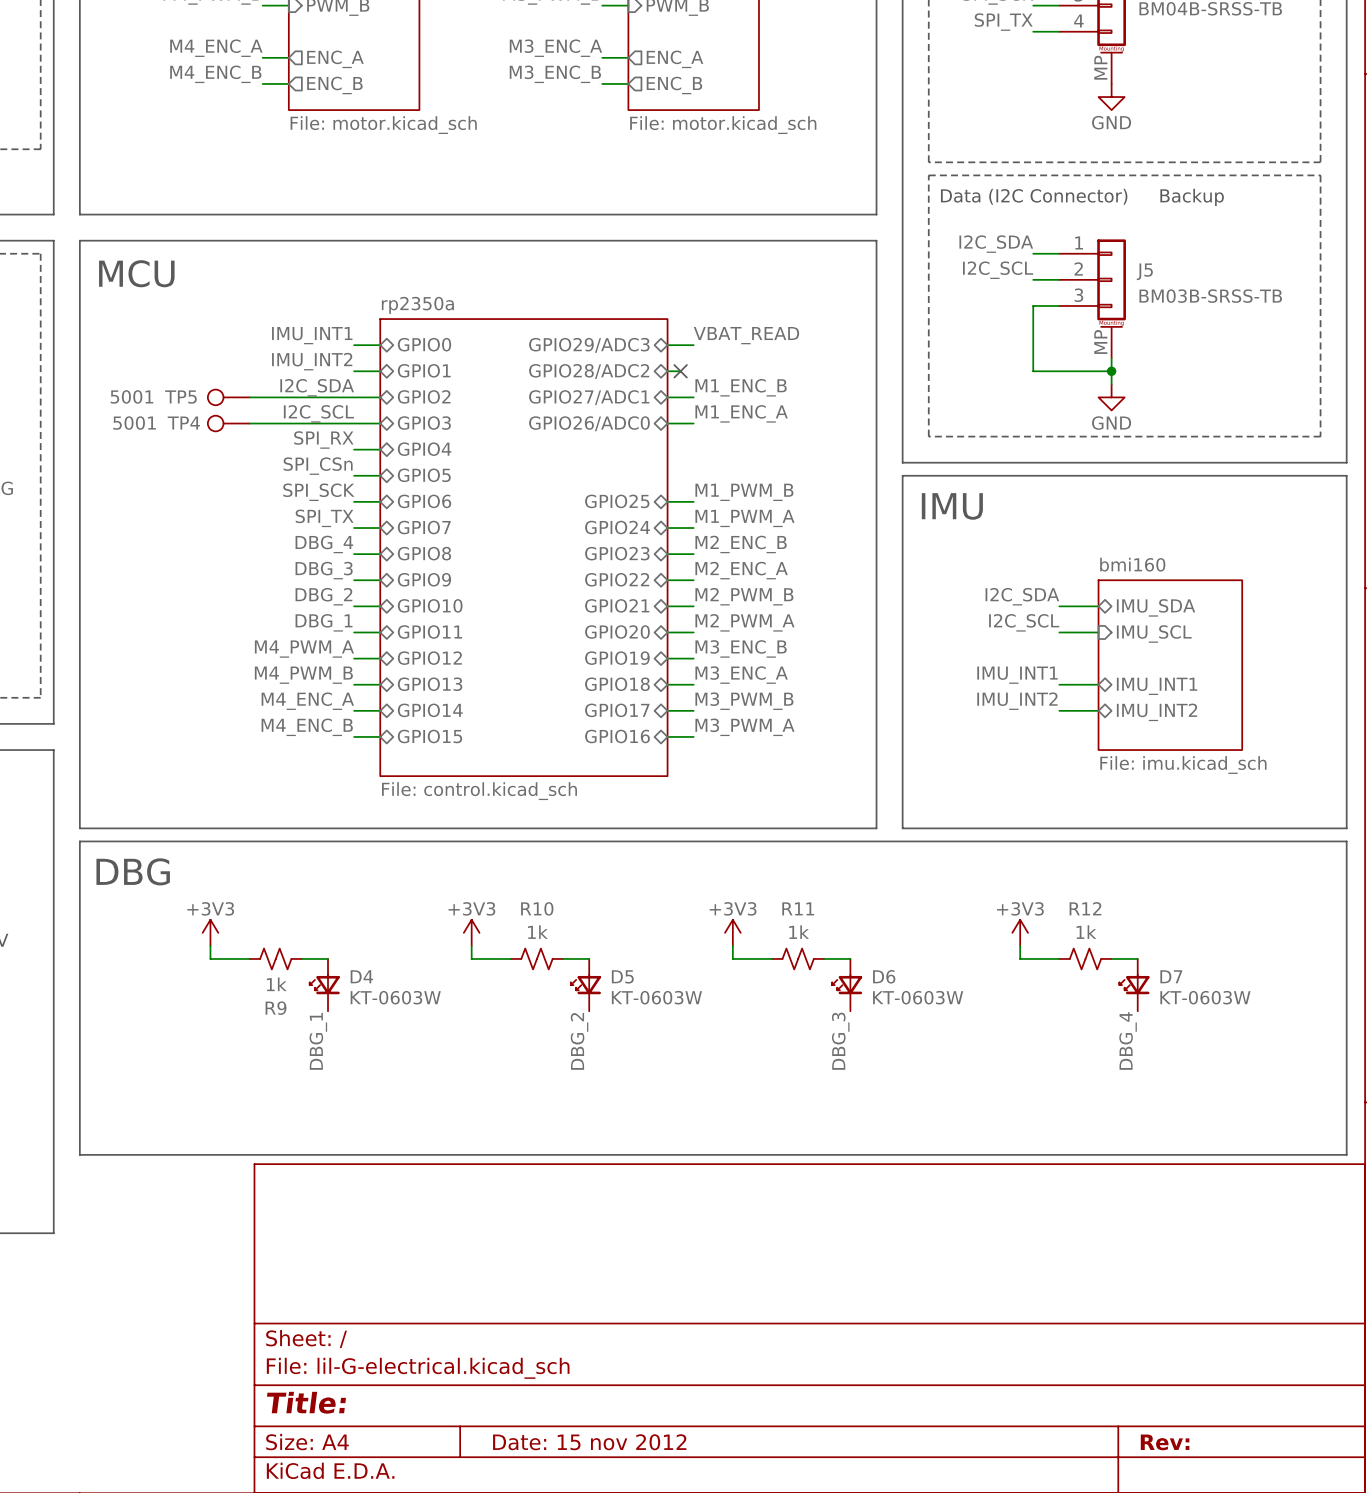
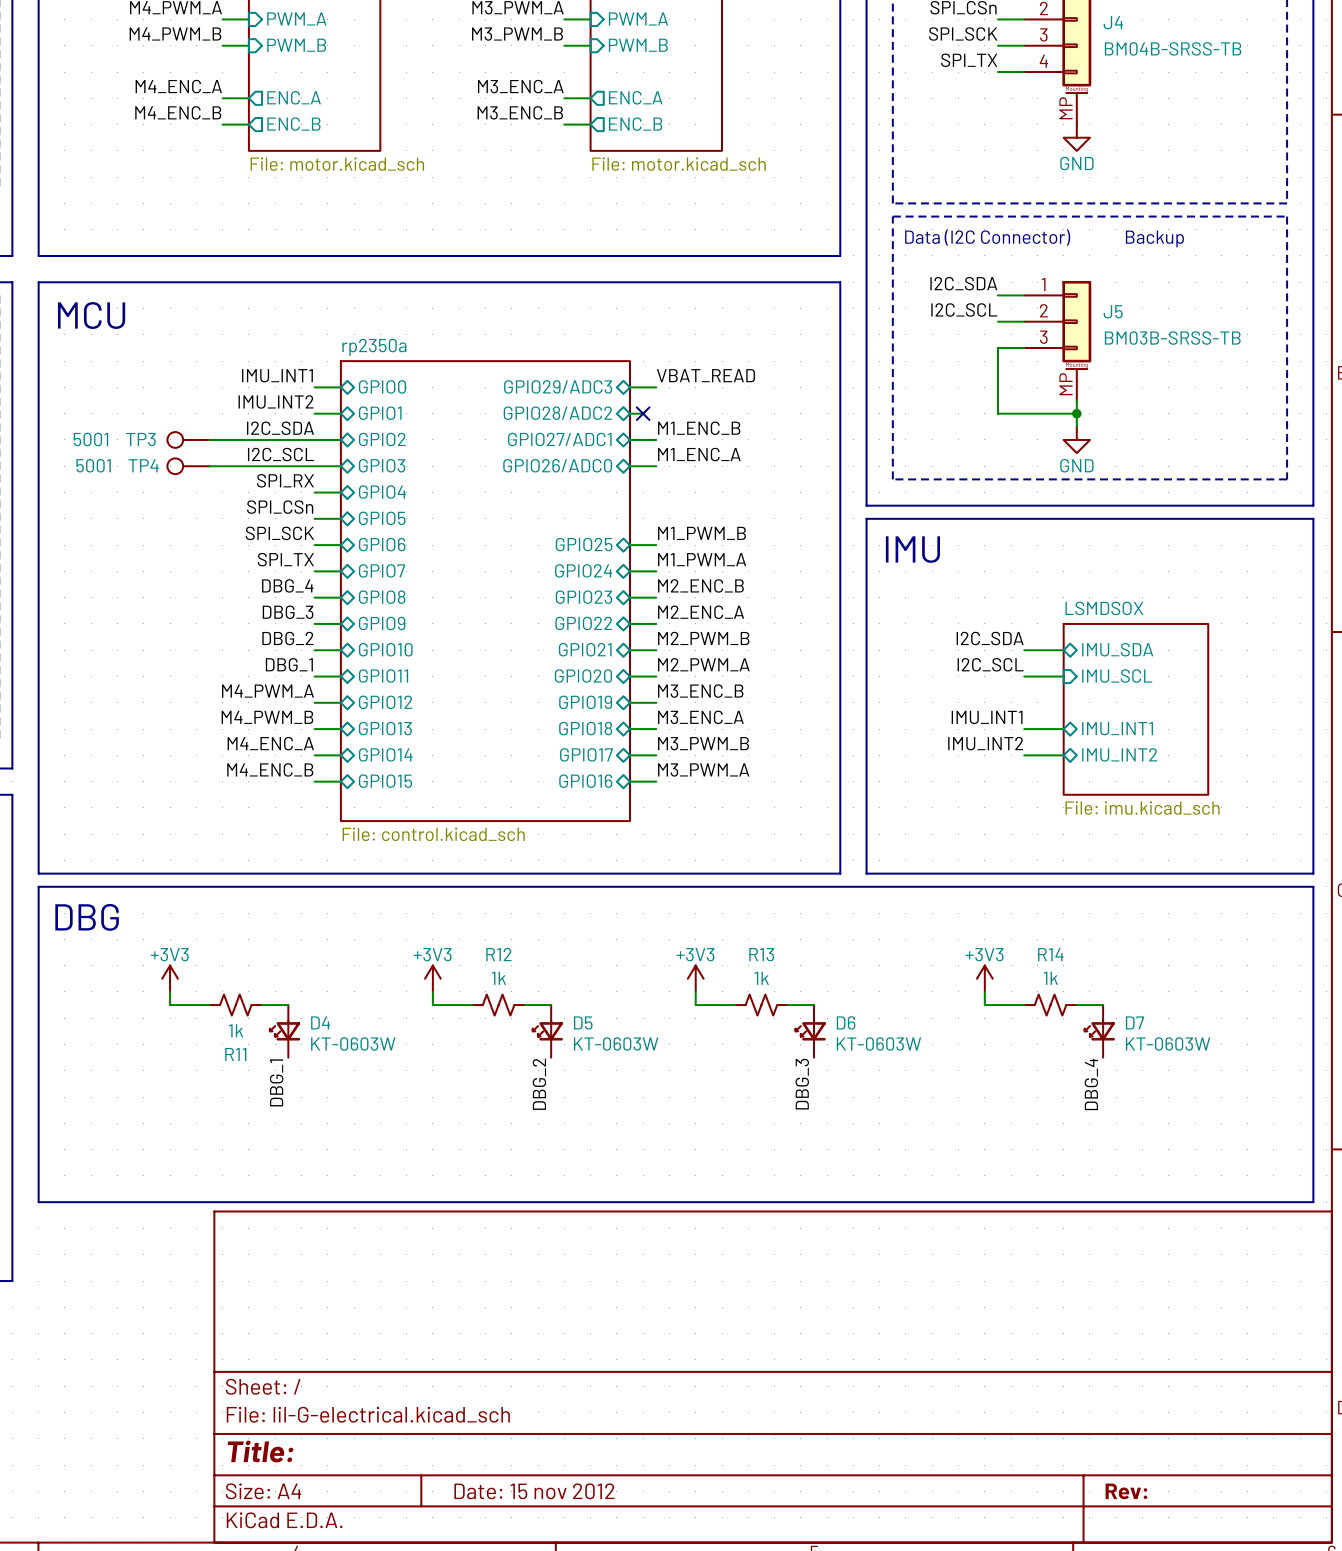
TP5 name: TP5 (180, 397) -> TP3 (140, 439)
sheet bmi160 name: bmi160 (1132, 564) -> LSMDSOX (1104, 608)
R10 name: R10 (537, 908) -> R12 (498, 954)
R11 name: R11 (798, 908) -> R13 (761, 954)
R12 name: R12 (1085, 908) -> R14 (1050, 954)
R9 name: R9 (276, 1008) -> R11 (235, 1054)

